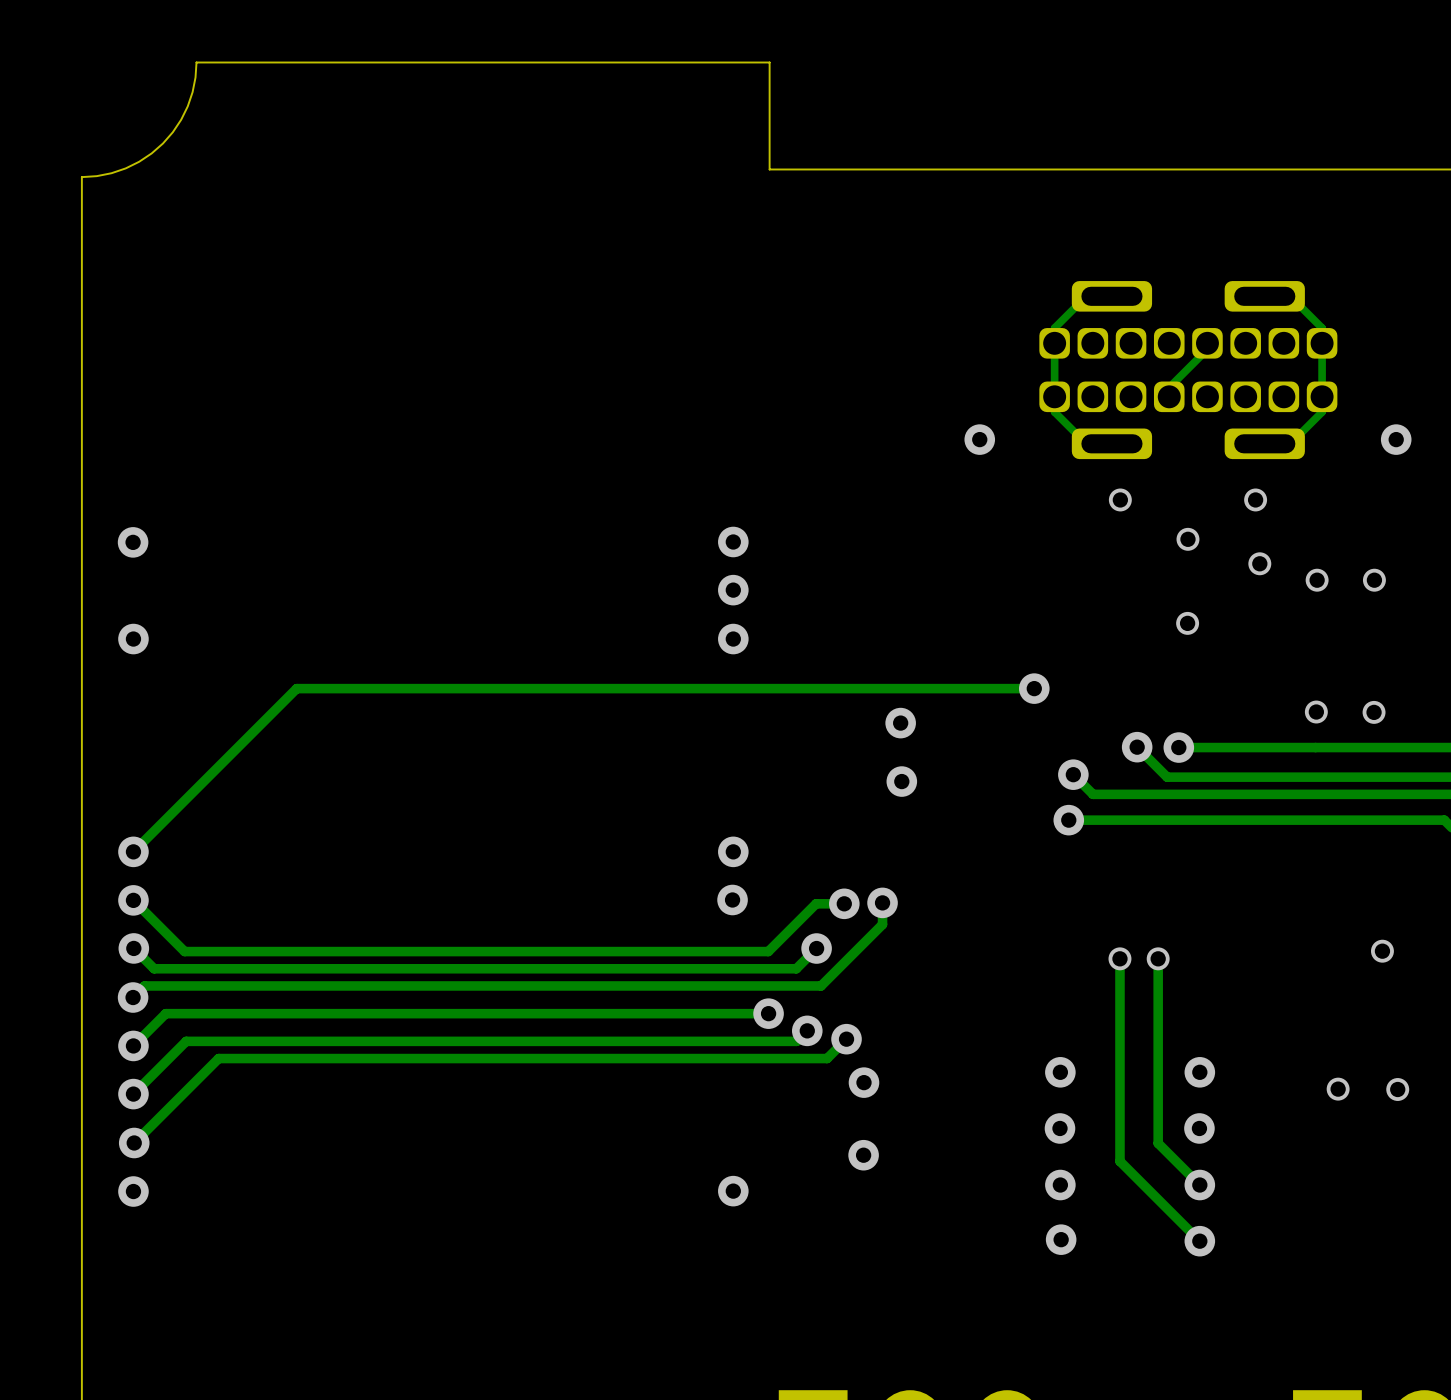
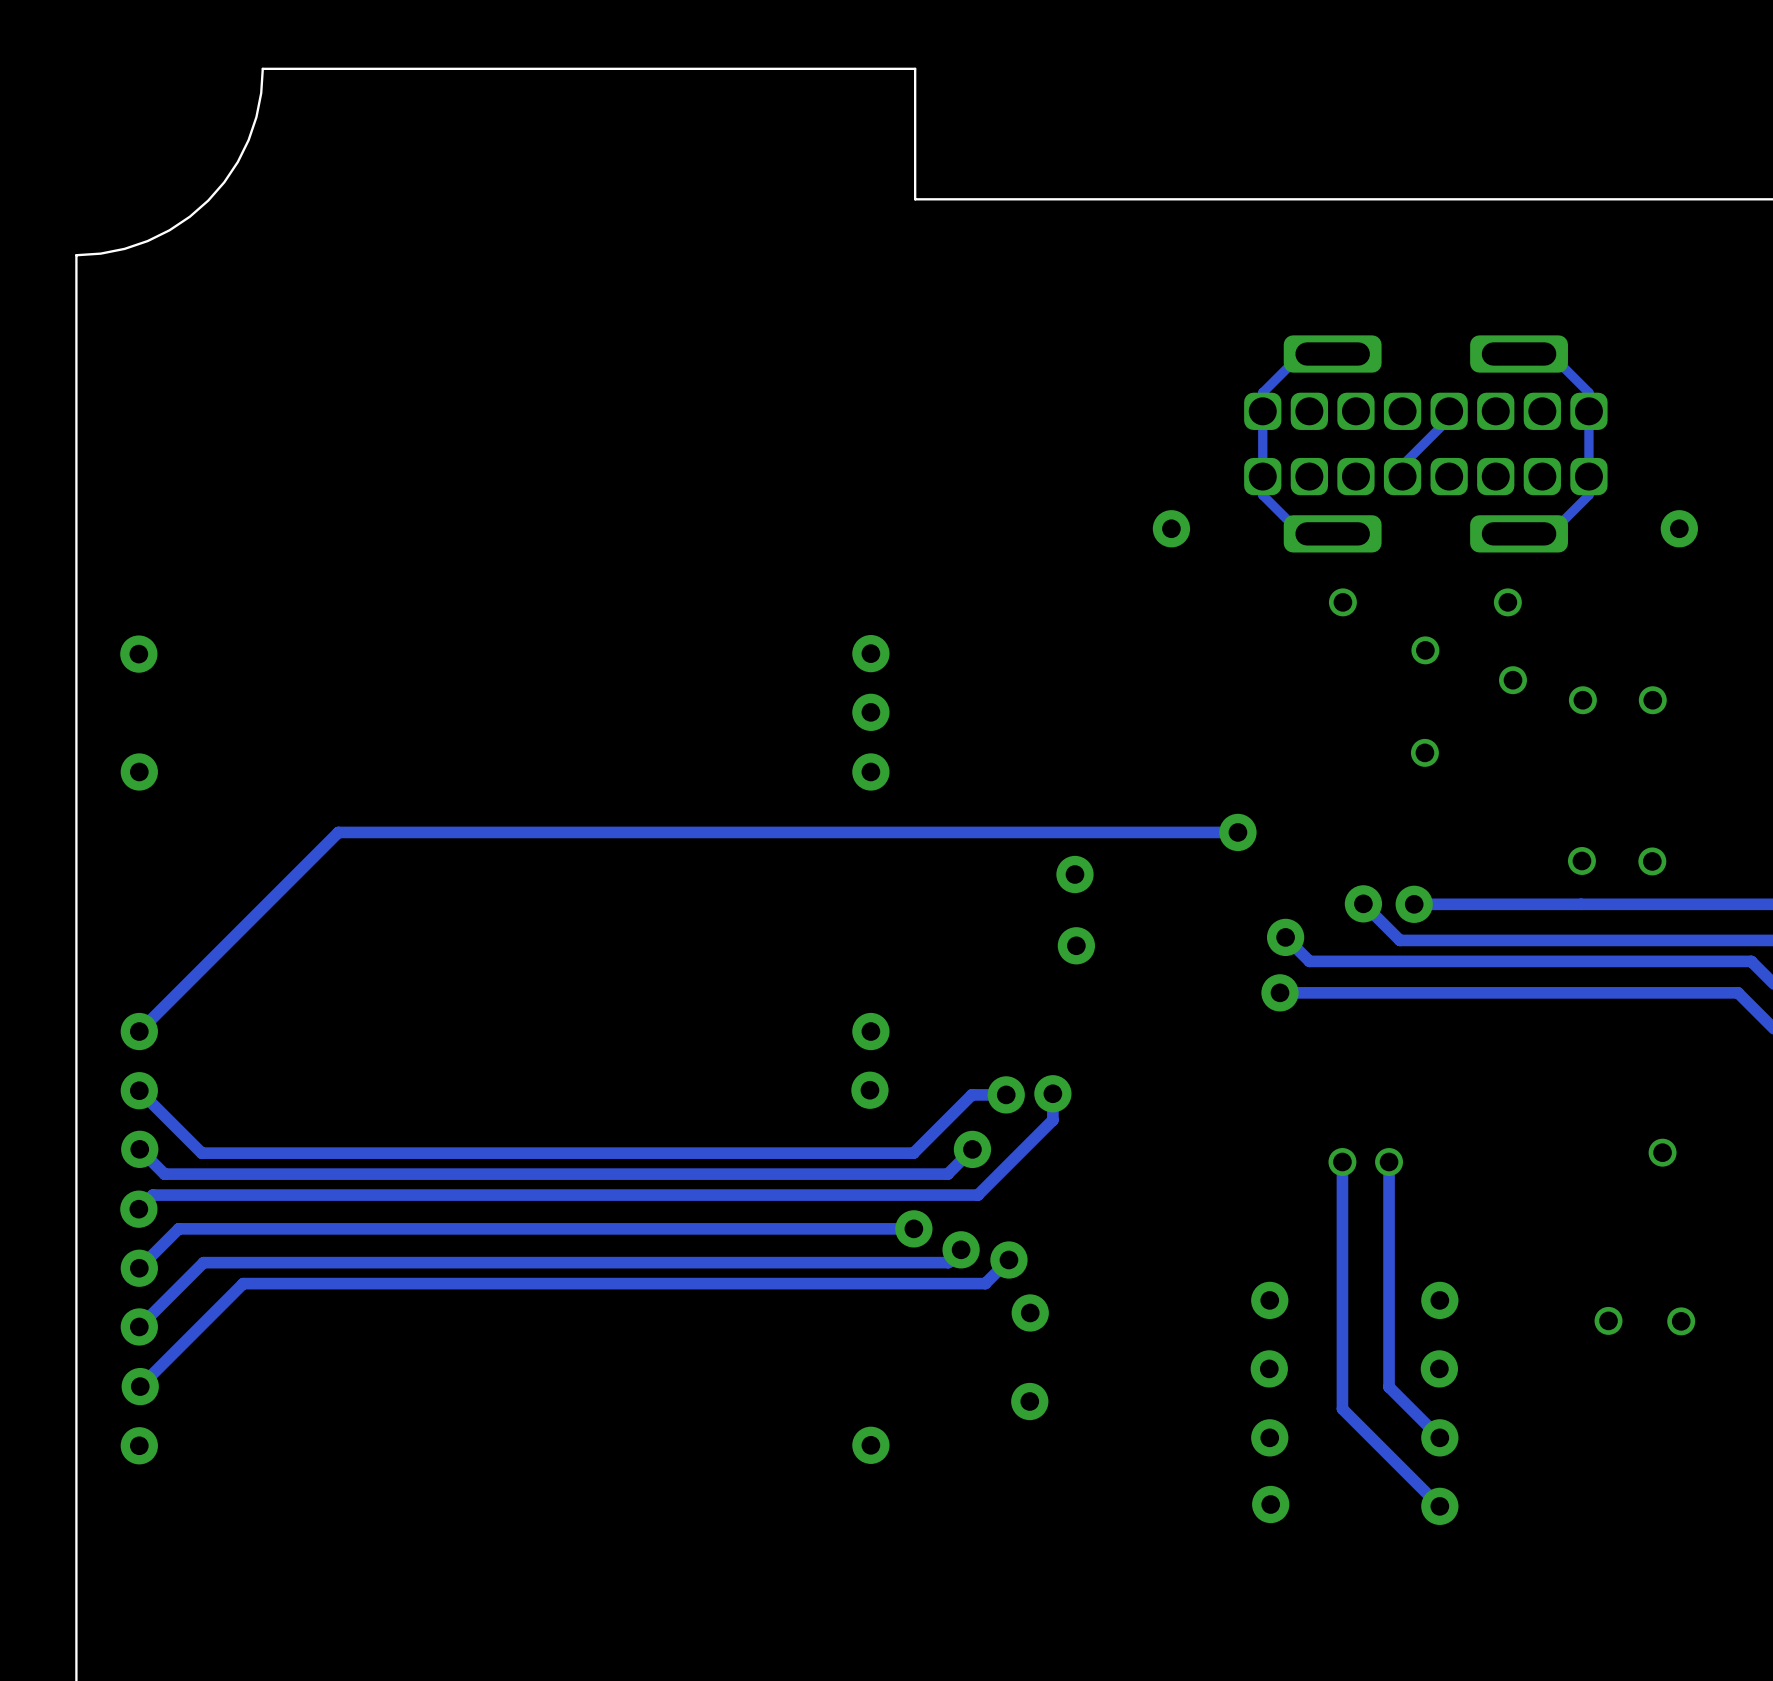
board edge: (234, 62) (196, 62) (195, 77) (187, 106) (172, 132) (162, 143) (151, 153) (125, 168) (111, 173) (81, 177) (81, 215) -> (262, 68) (261, 93) (256, 117) (248, 140) (237, 162) (224, 182) (208, 200) (189, 216) (169, 230) (147, 241) (124, 248) (100, 253) (76, 255)

